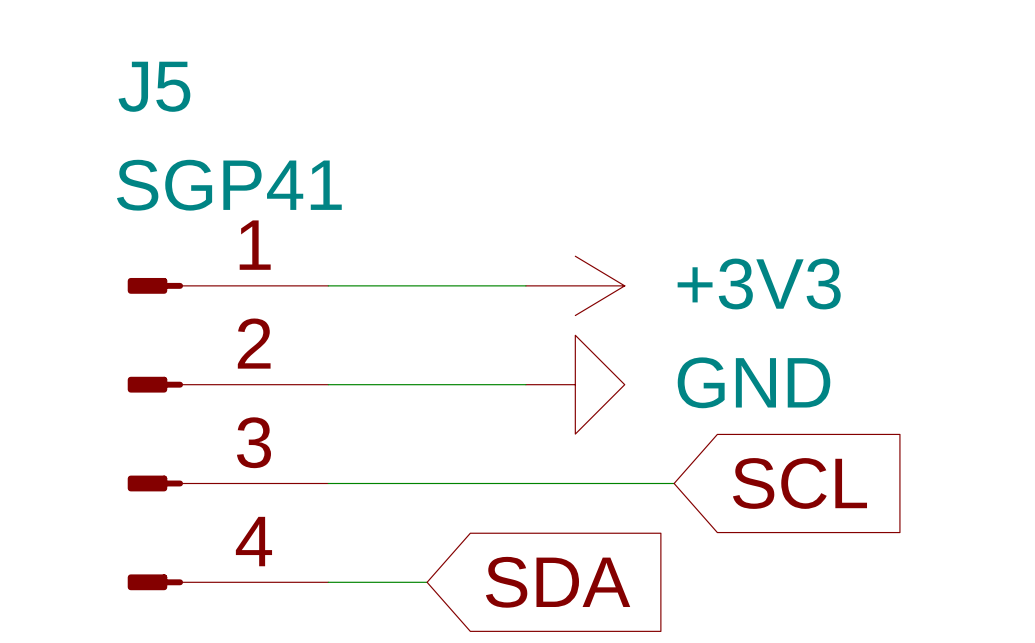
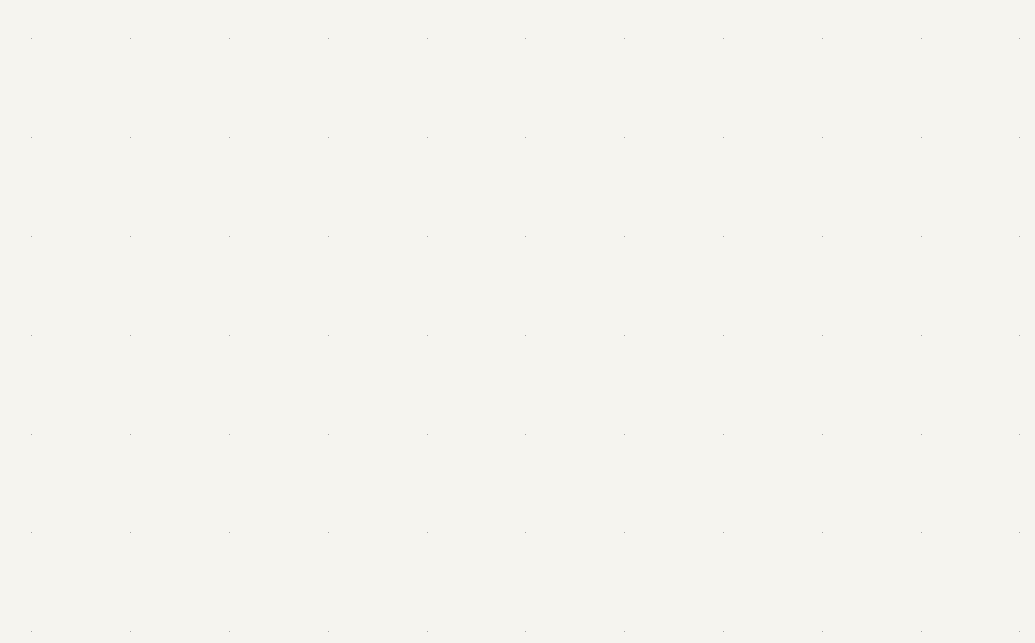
wire: (328, 285) (525, 285) -> none
power symbol: +3V3 (575, 285) -> none
wire: (328, 384) (525, 384) -> none
power symbol: GND (575, 384) -> none
J5: SGP41 (228, 434) -> none
wire: (328, 483) (674, 483) -> none
global label: SCL (800, 483) -> none
wire: (328, 582) (427, 582) -> none
global label: SDA (558, 582) -> none

